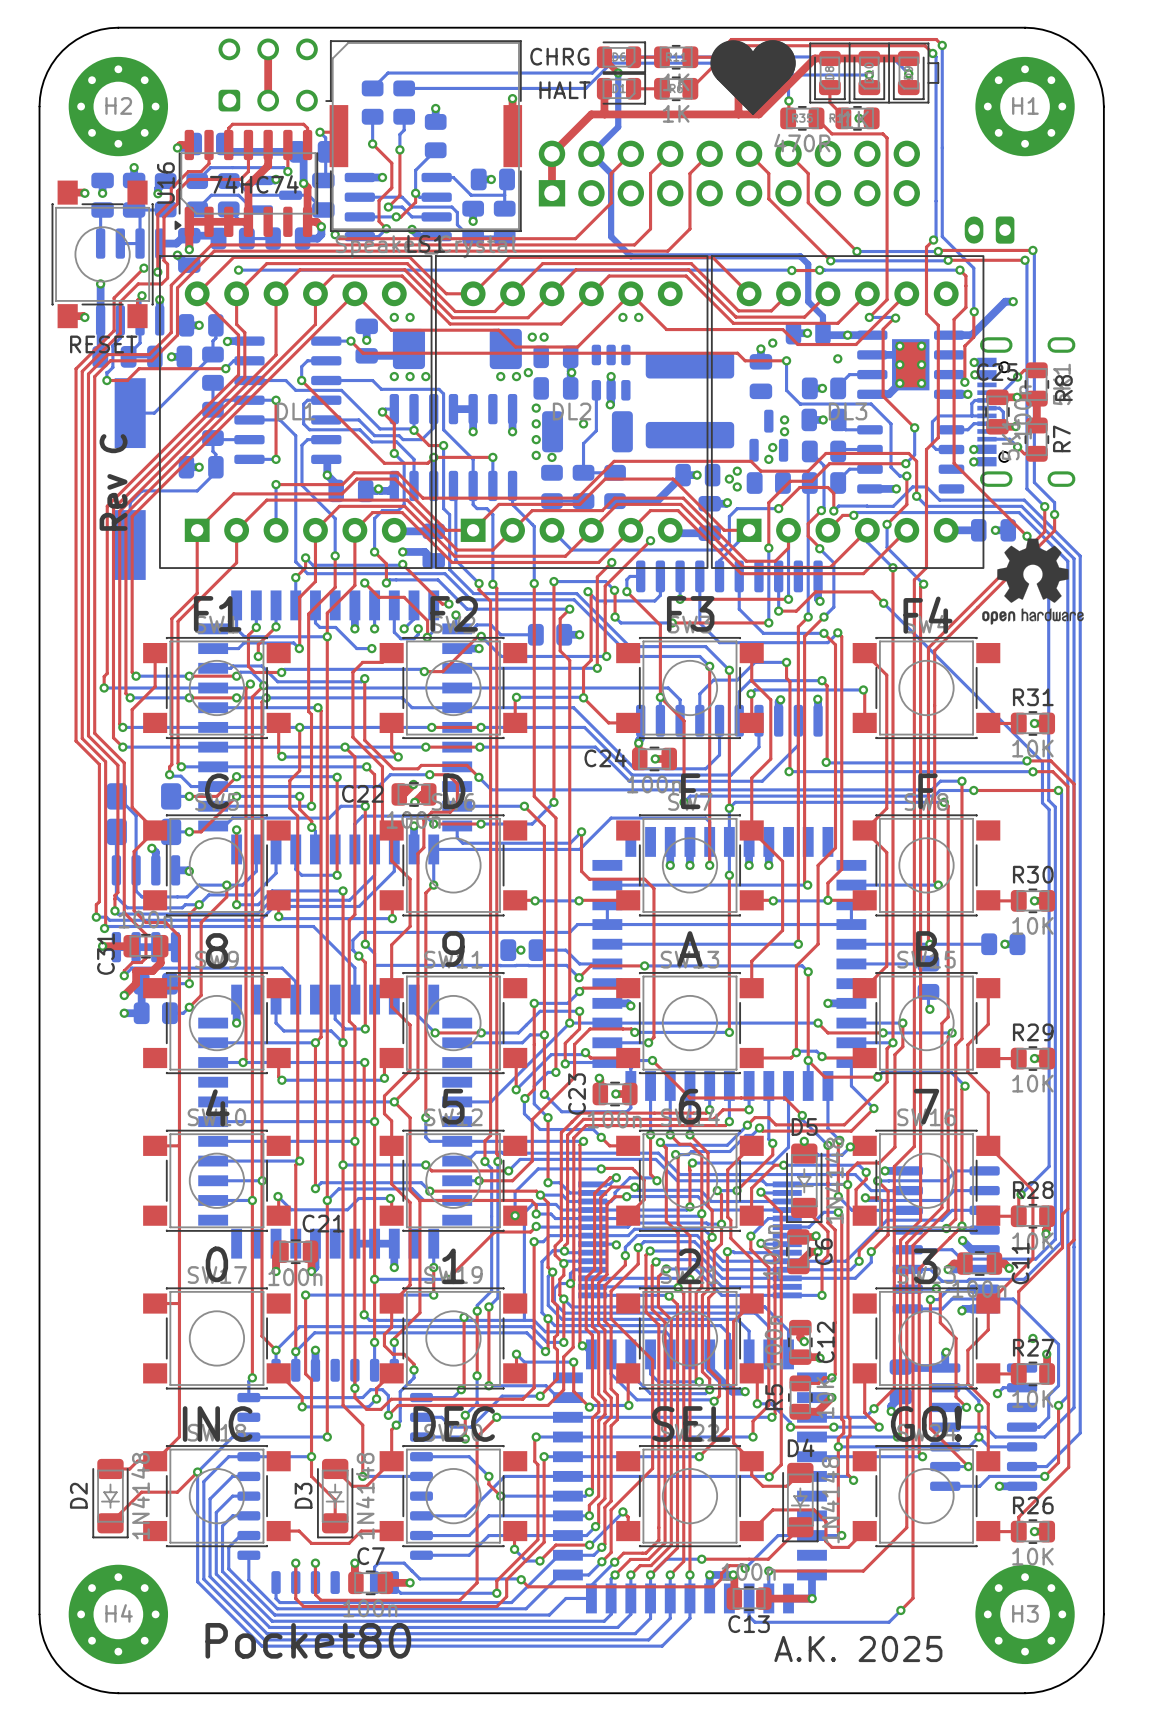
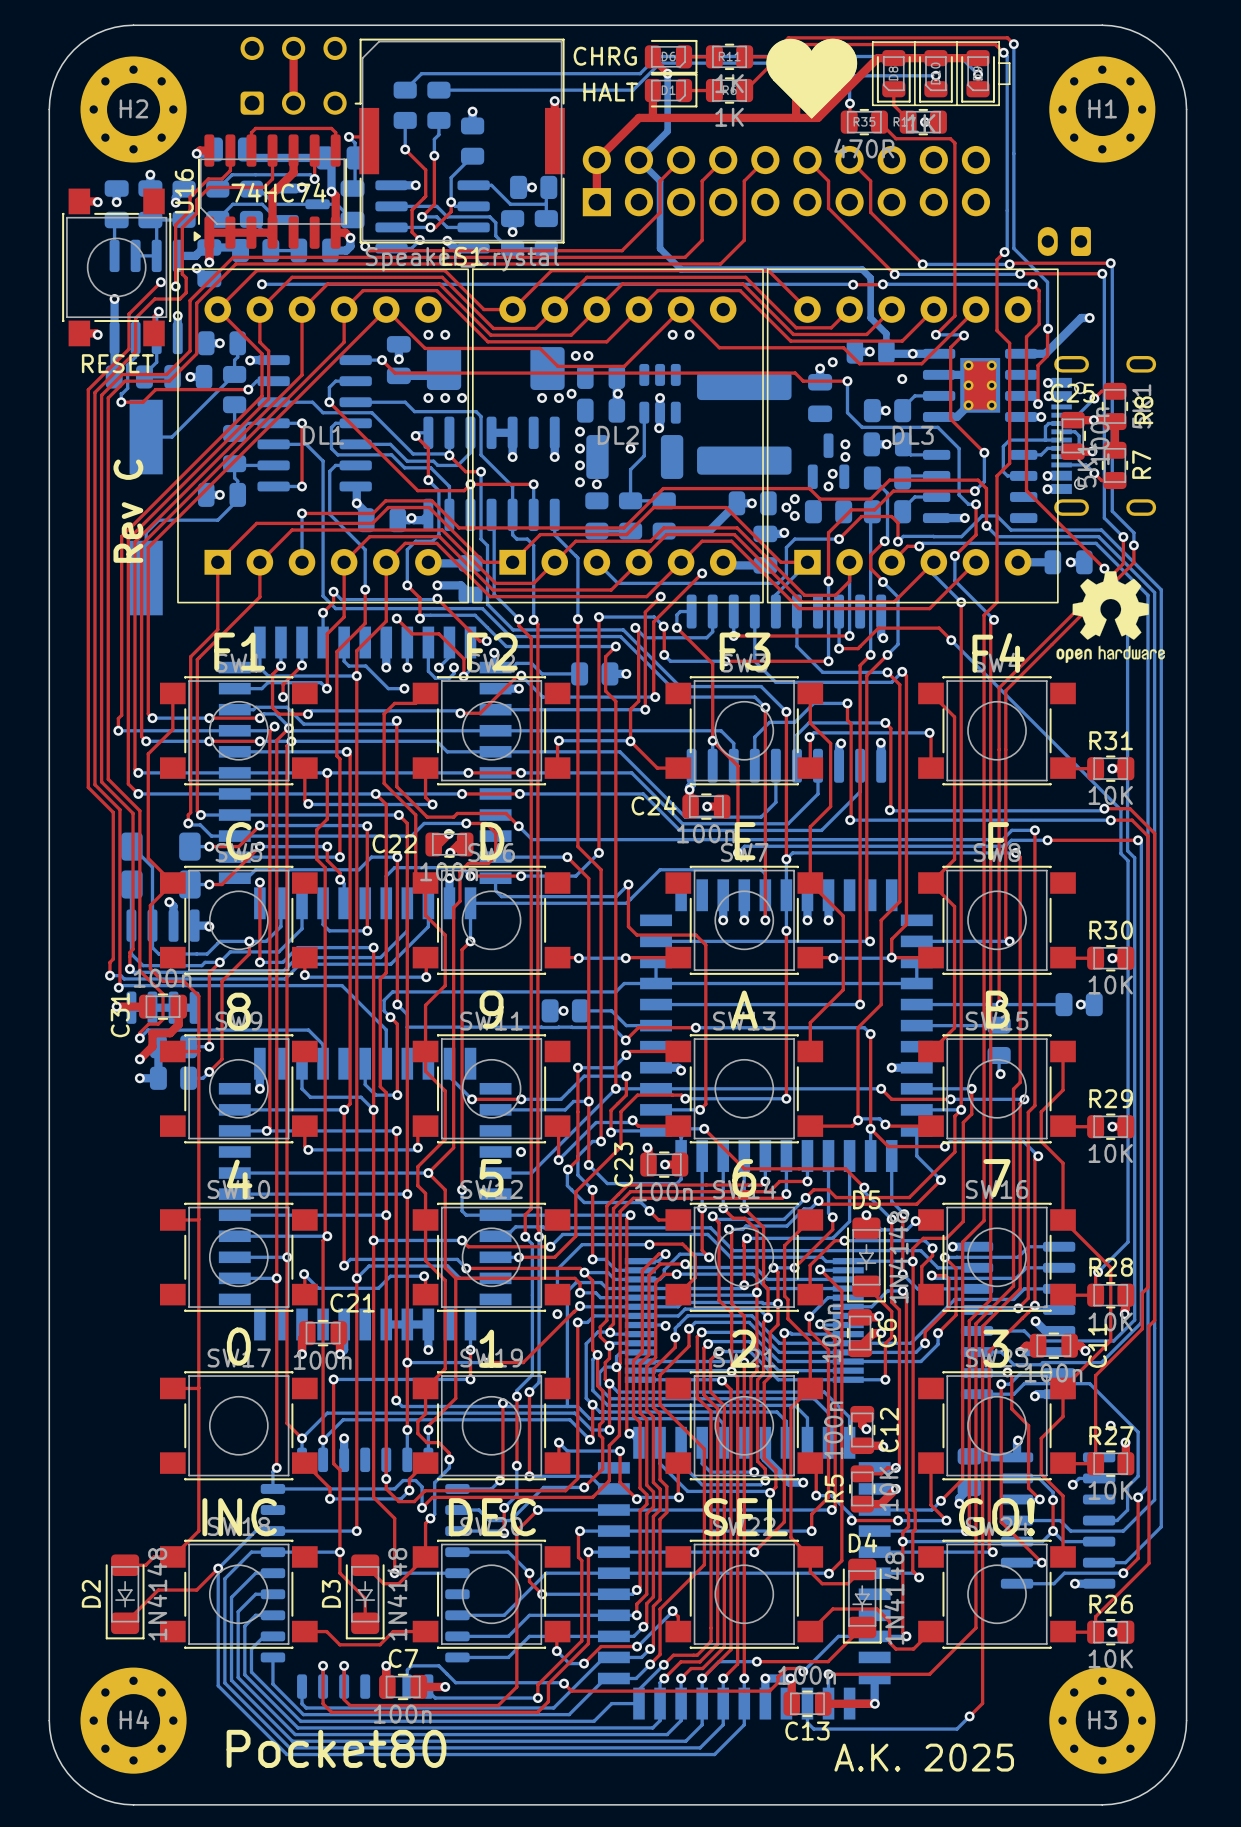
via: none -> (521, 1151)
via position: (515, 1215) -> (557, 1314)
top track: (530, 1232) (494, 1232) (447, 1279) -> (573, 1312) (523, 1362) (485, 1362)

